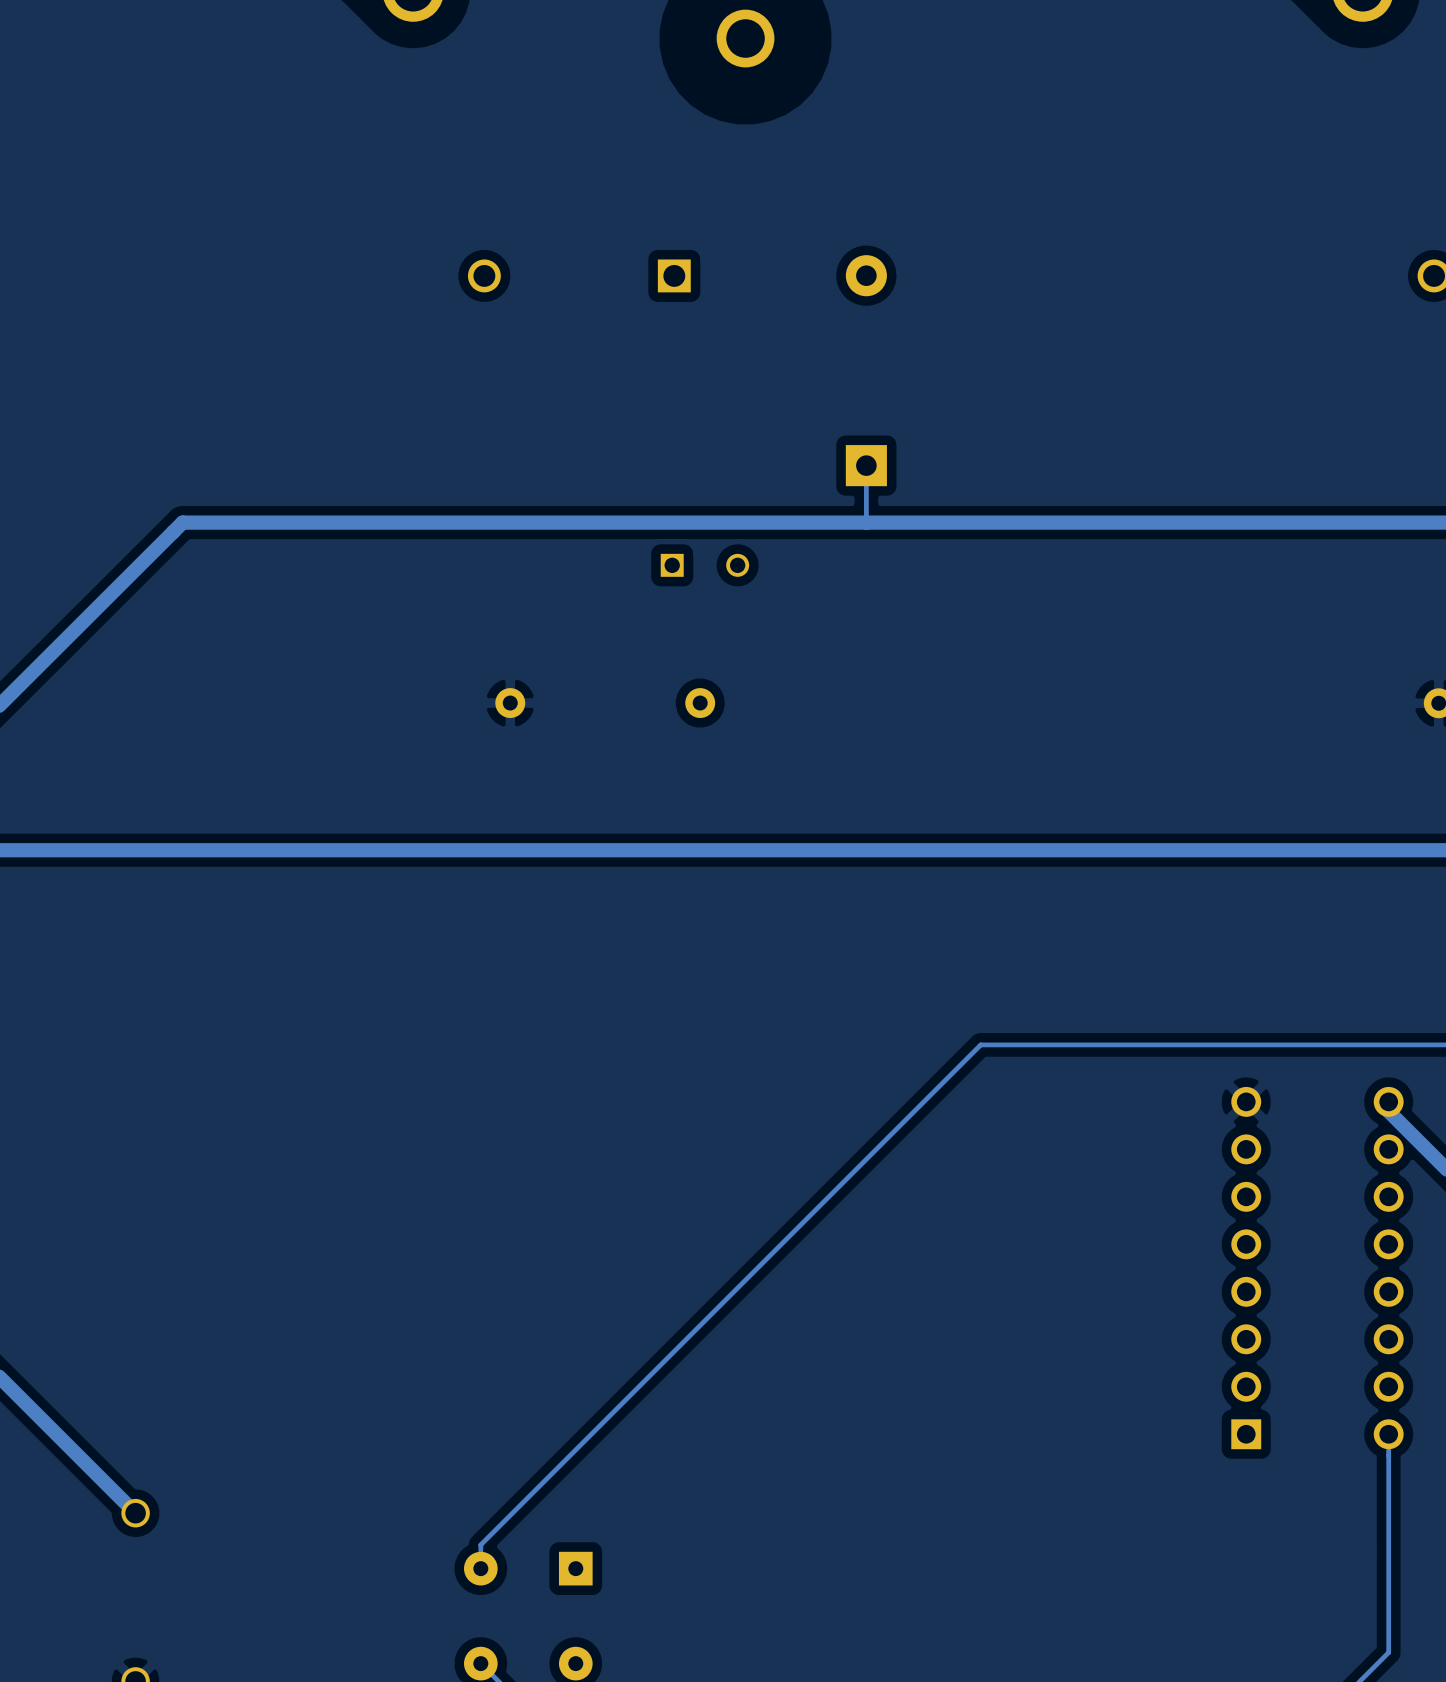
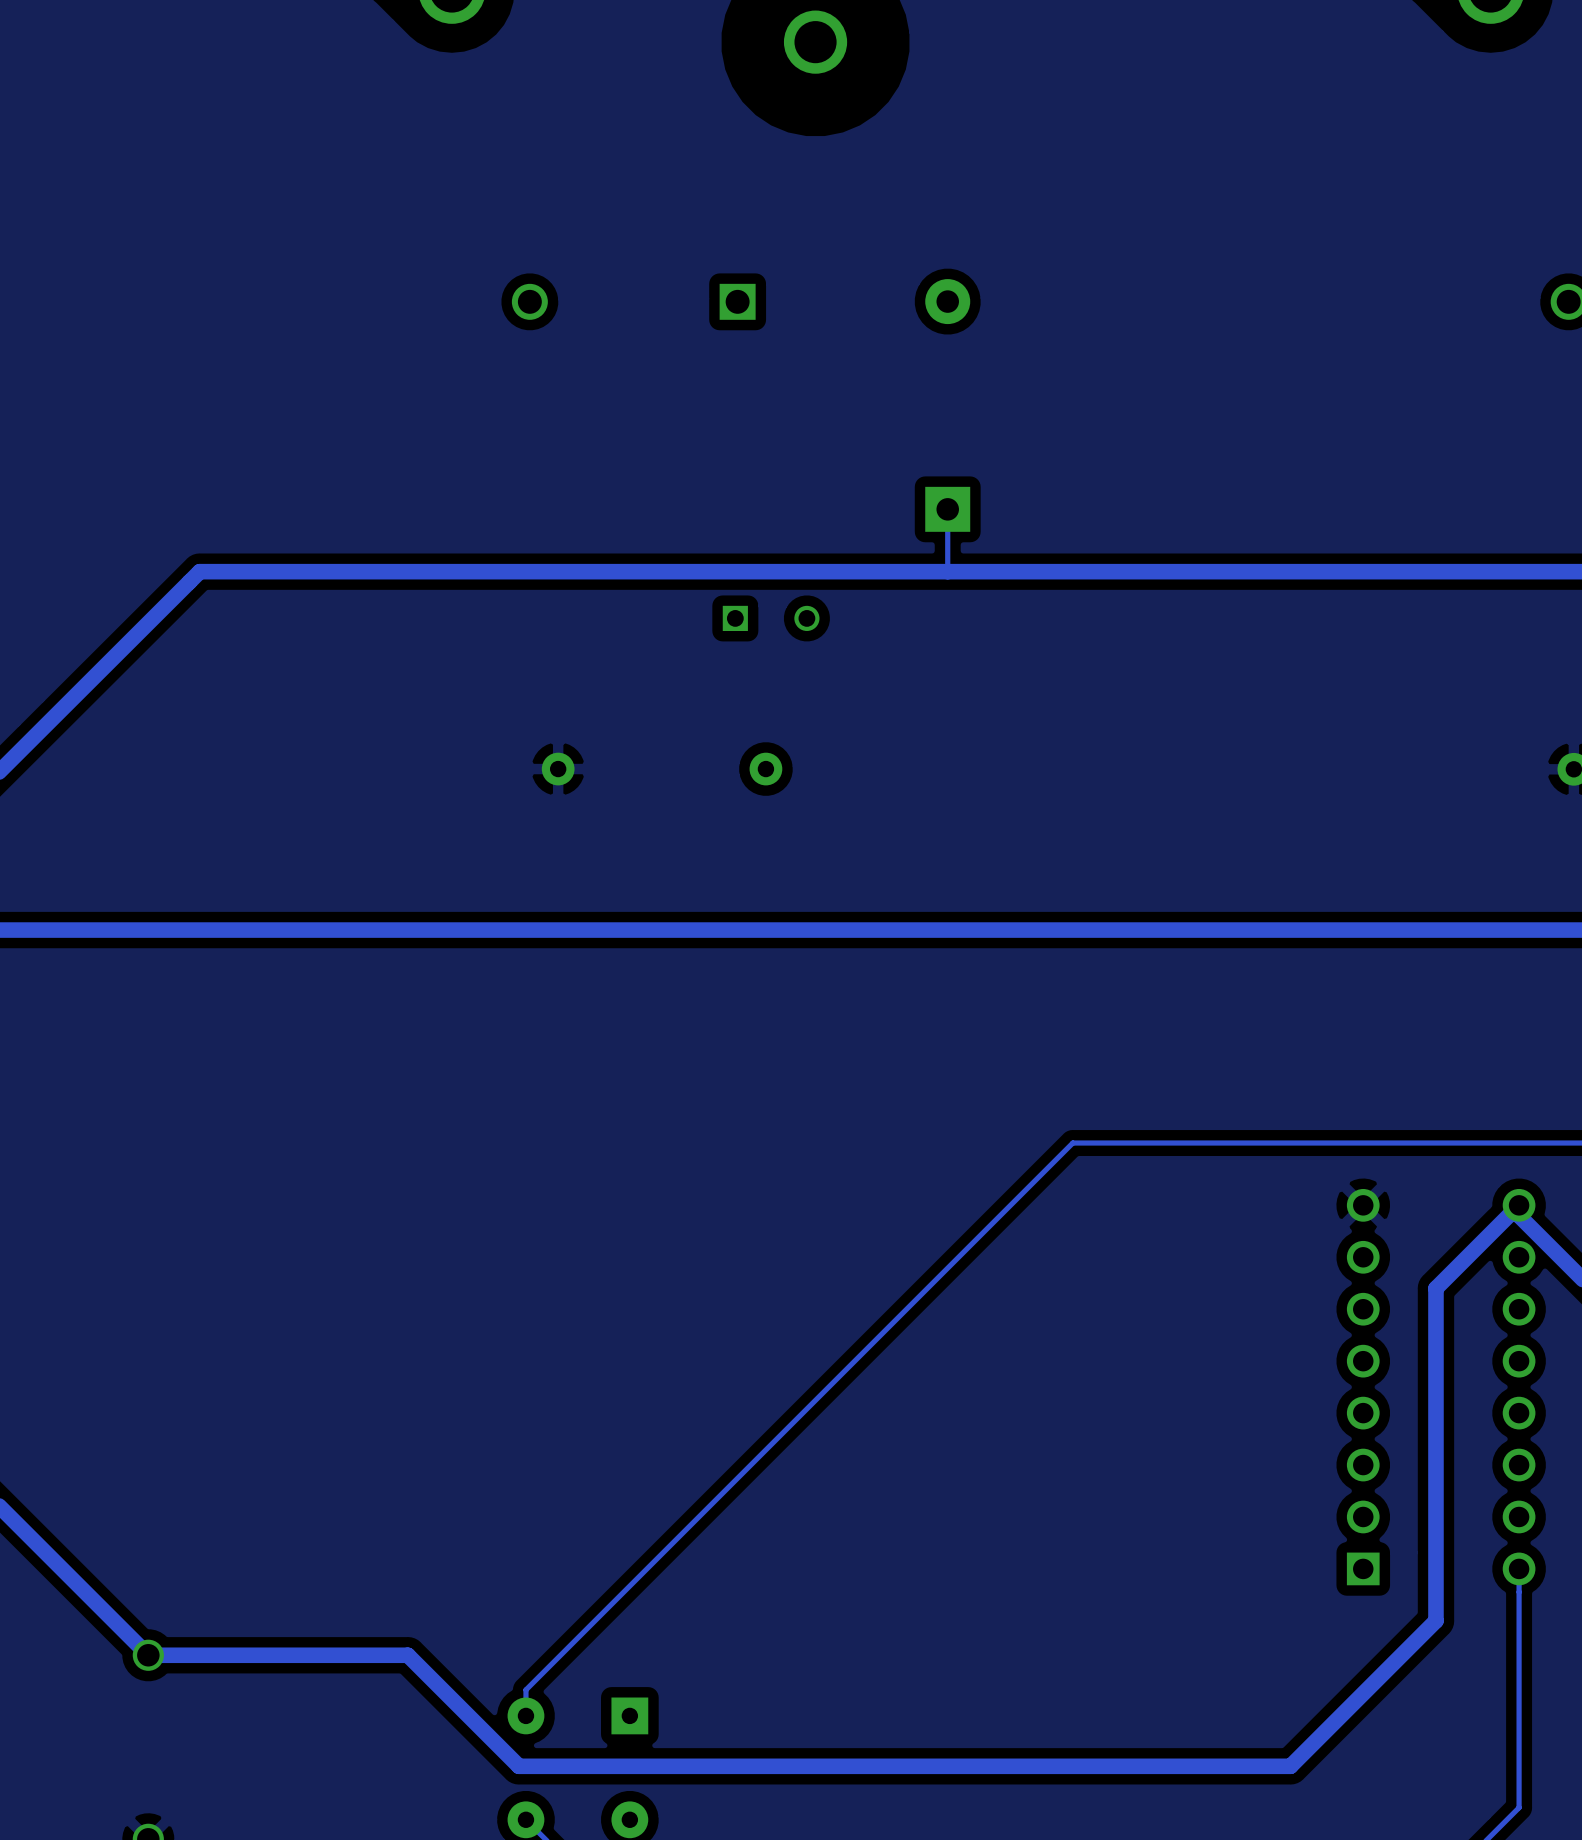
track: none -> (1519, 1205) (1435, 1288) (1435, 1620) (1290, 1766) (518, 1766) (407, 1655) (148, 1655)

